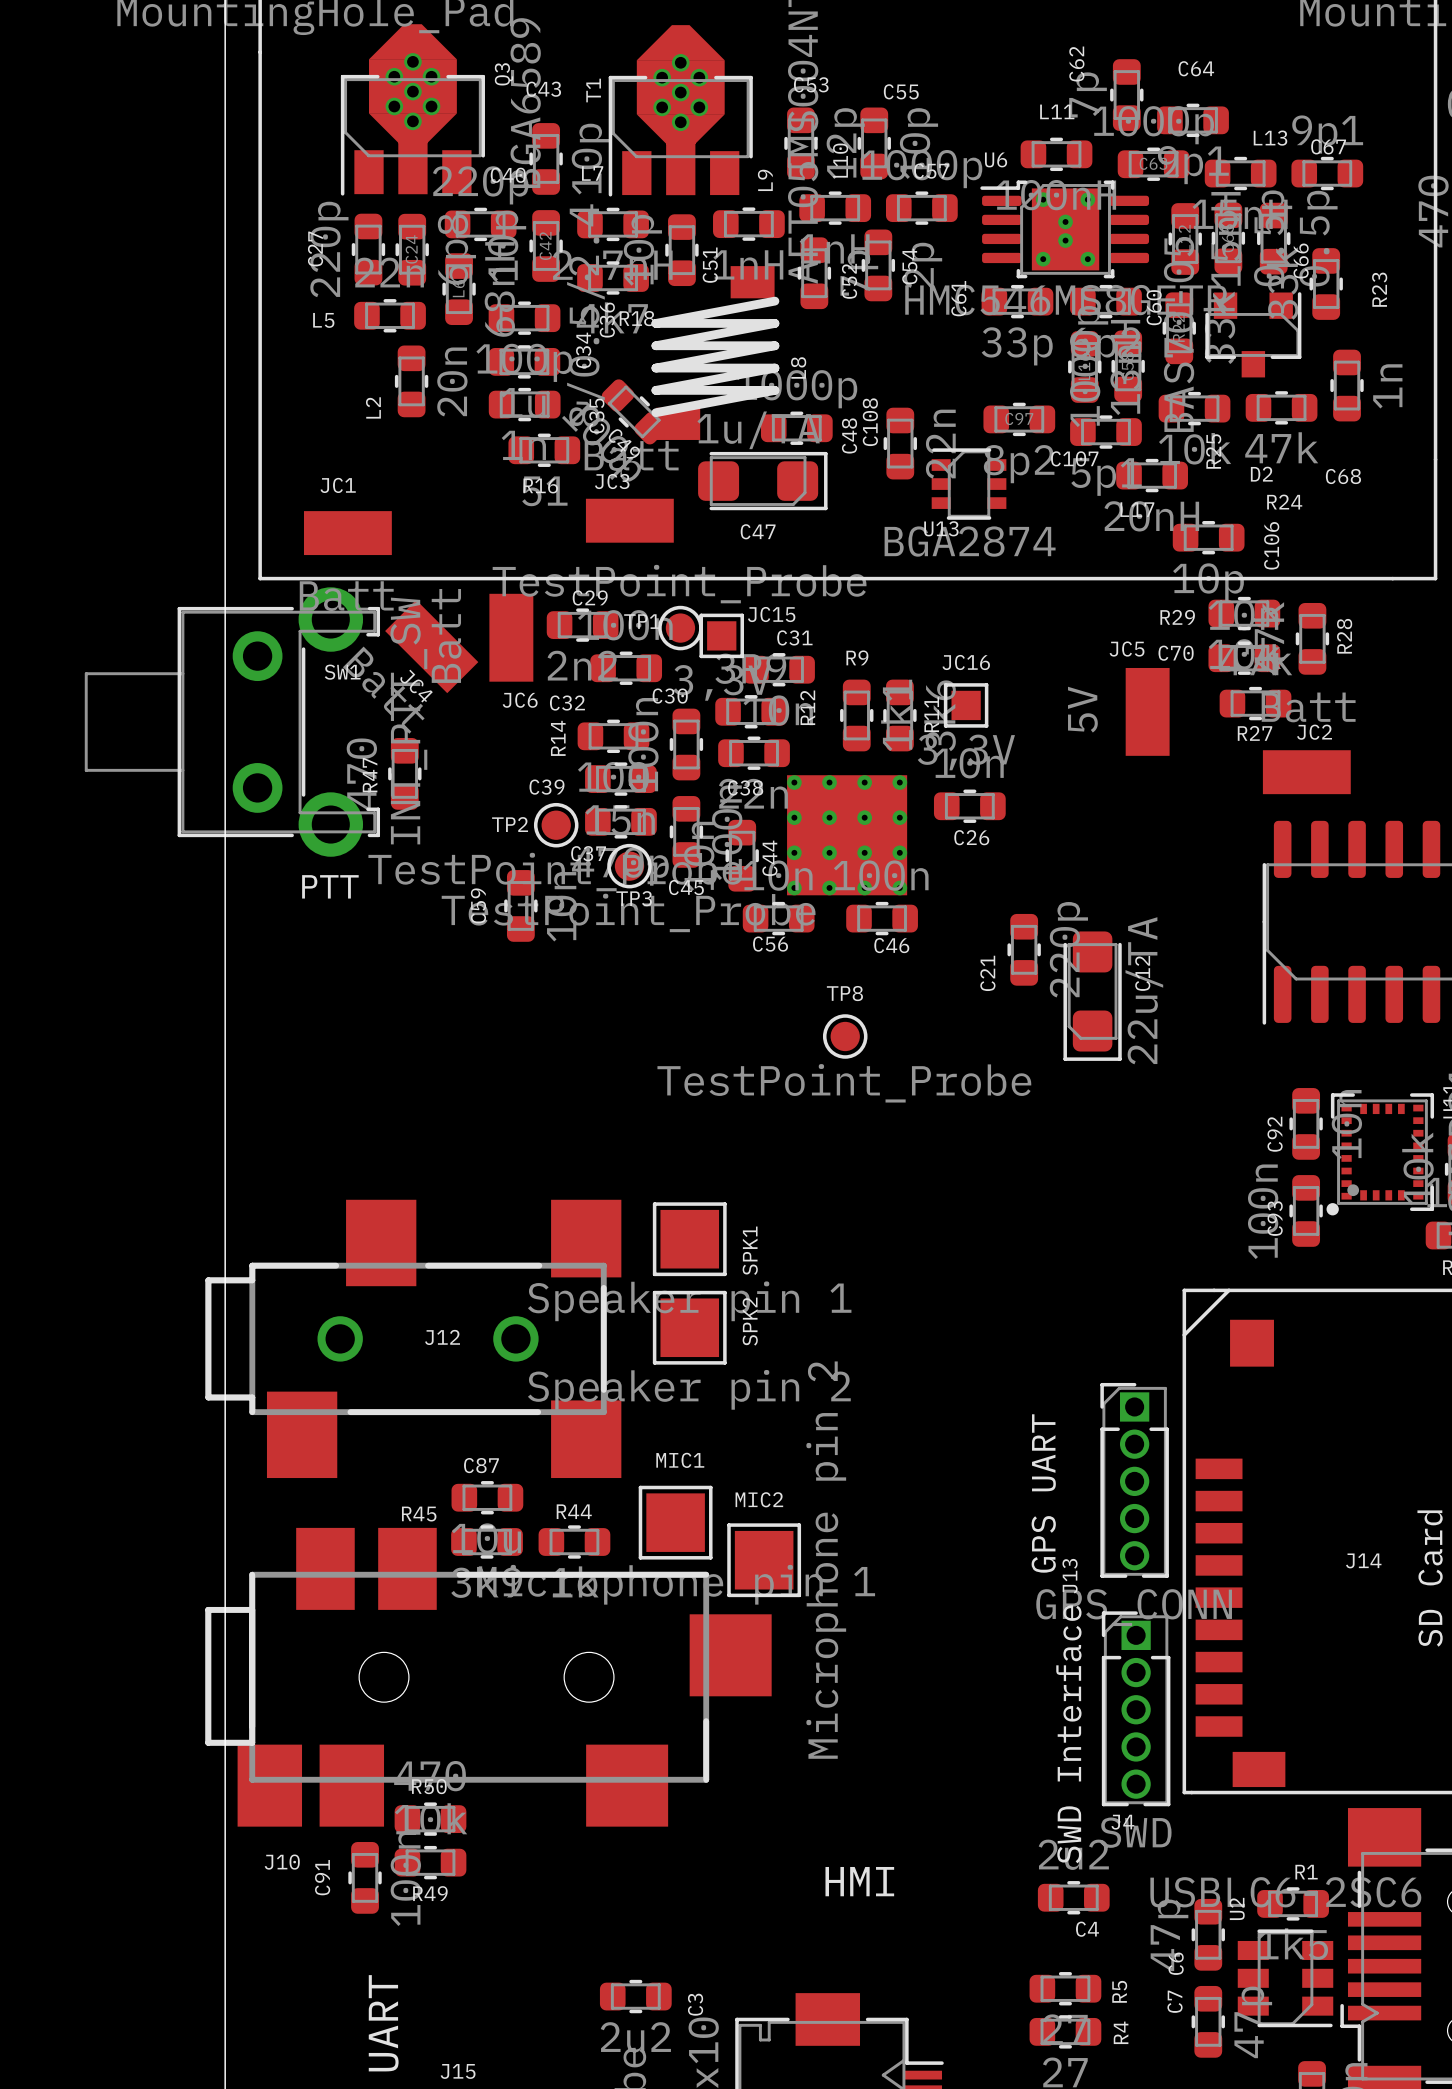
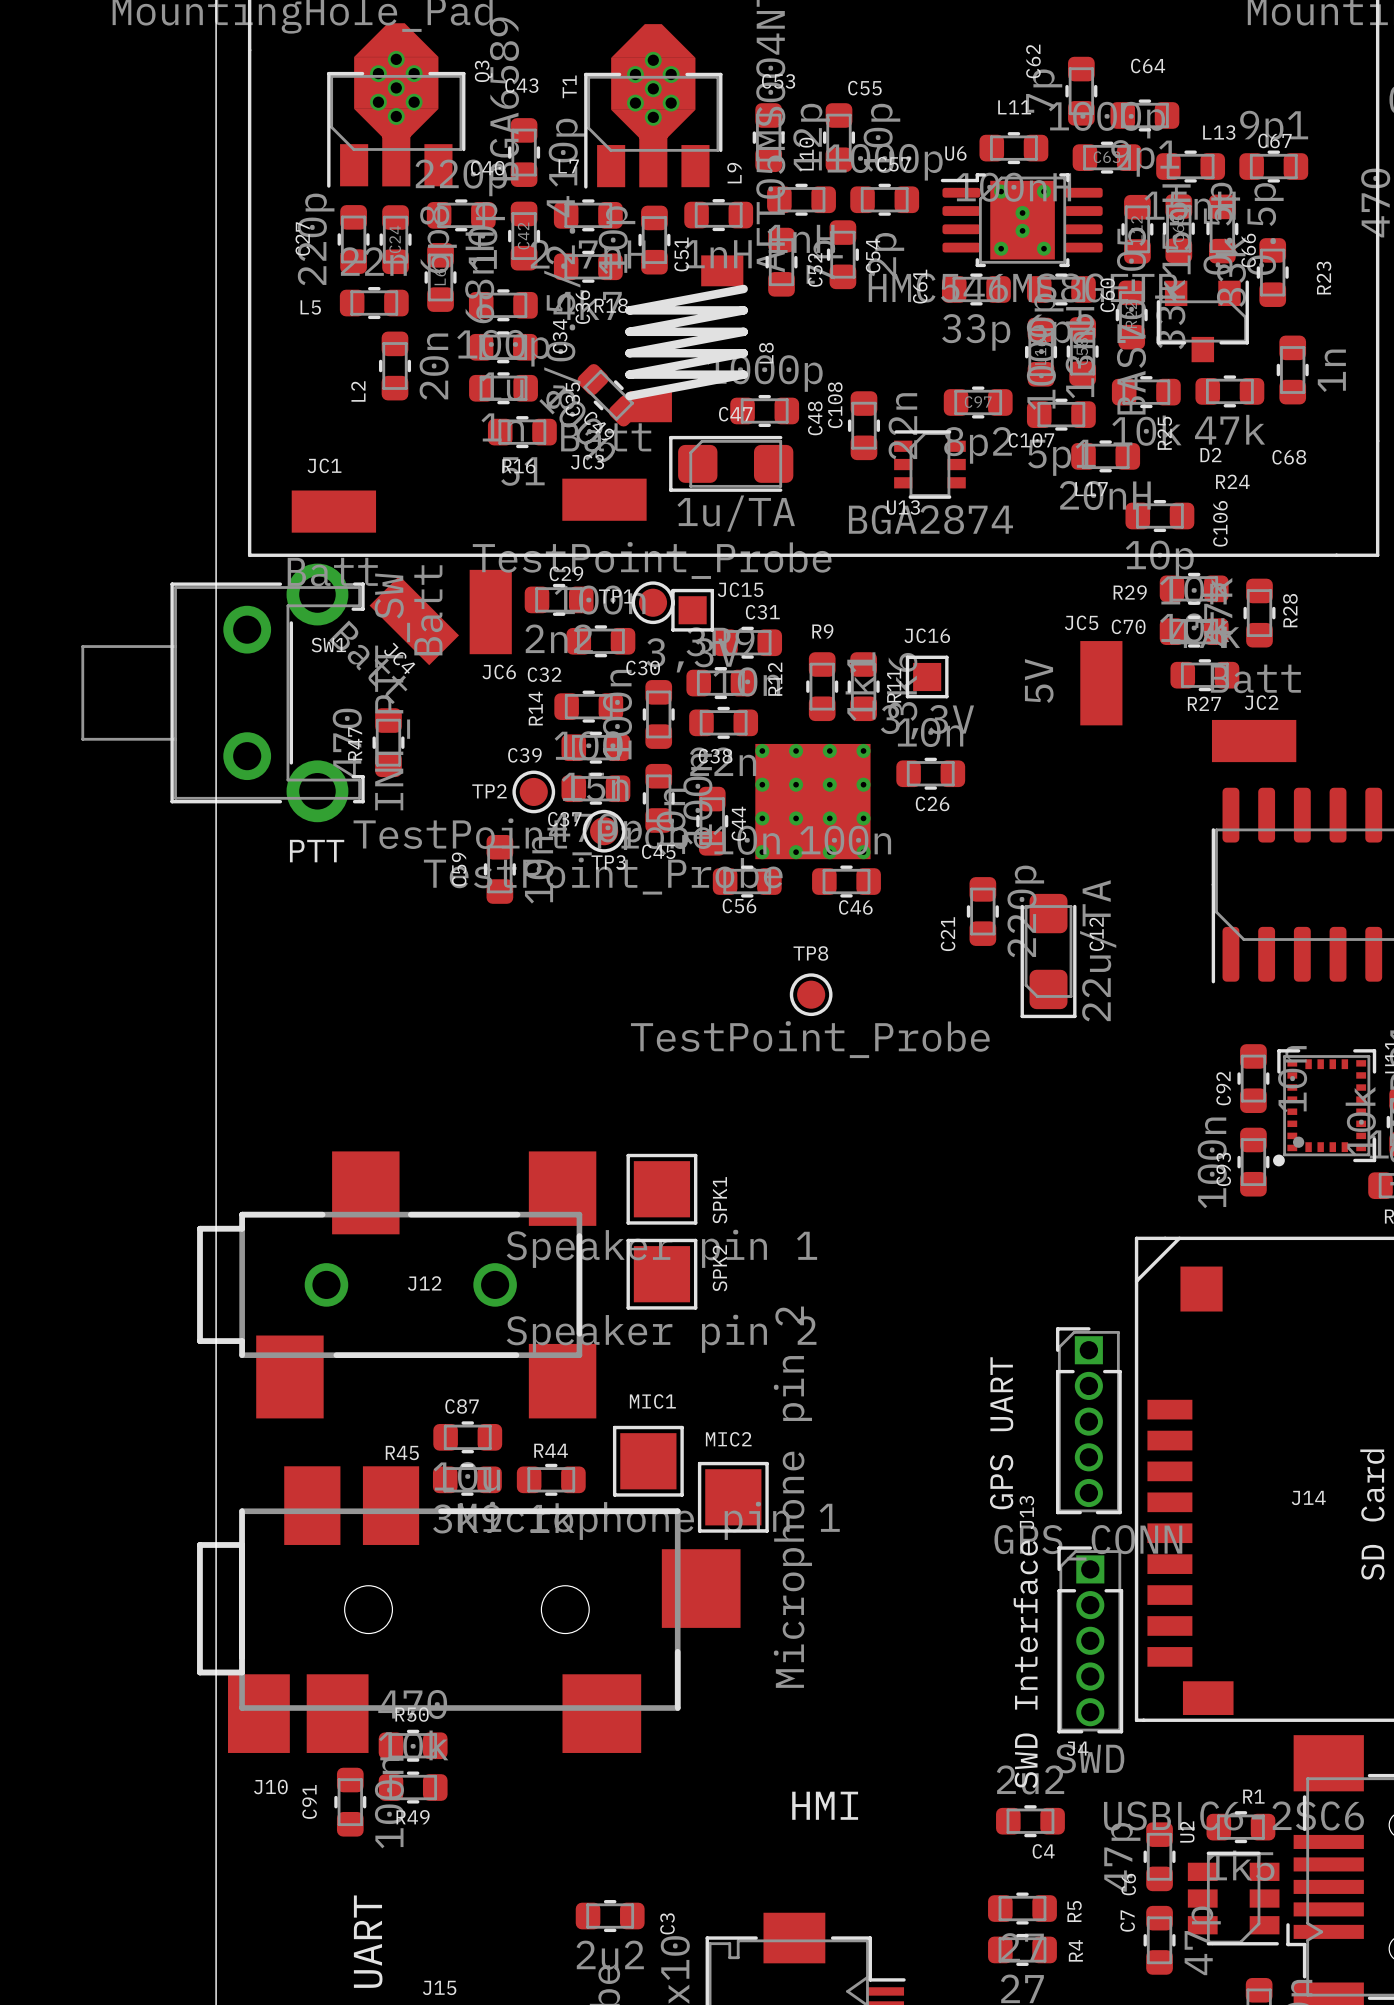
C47 rotation: 0° (762, 481) -> 180° (731, 463)

